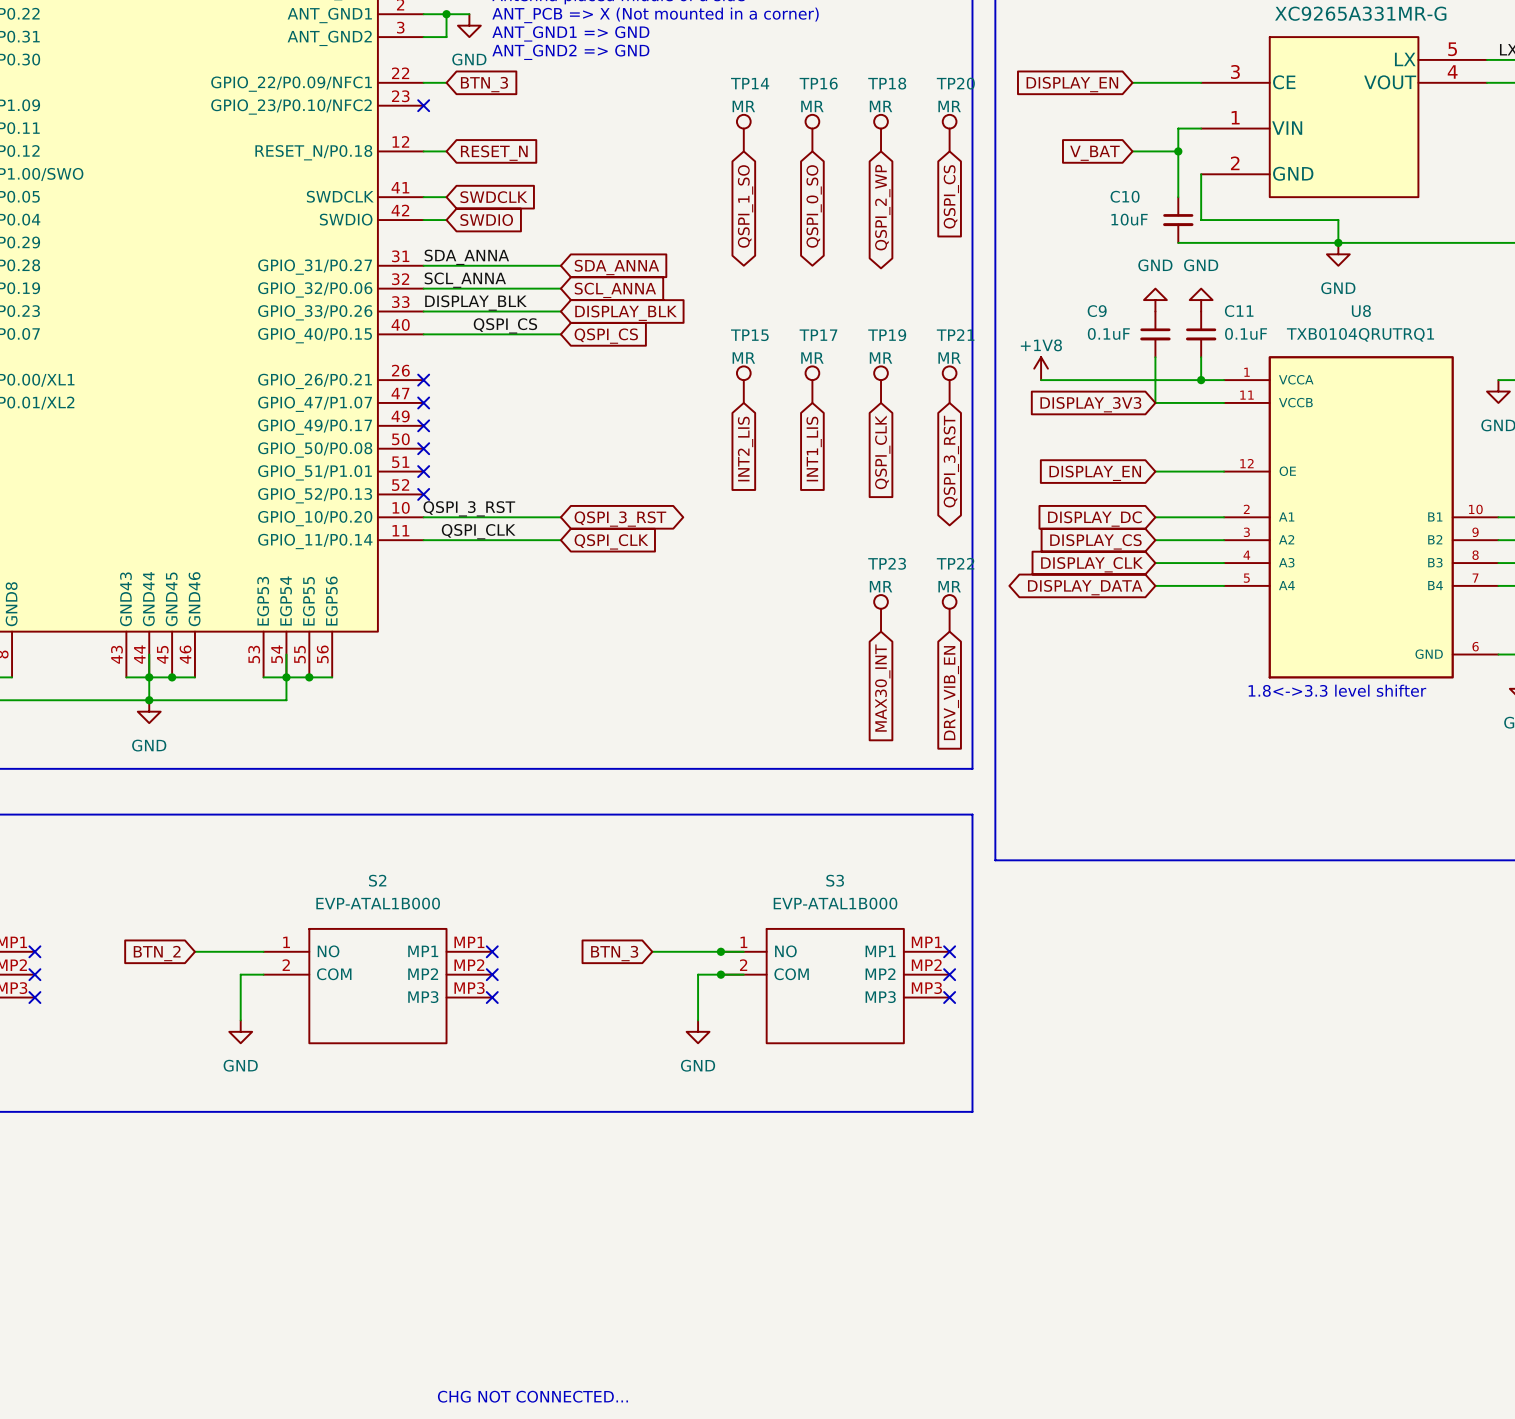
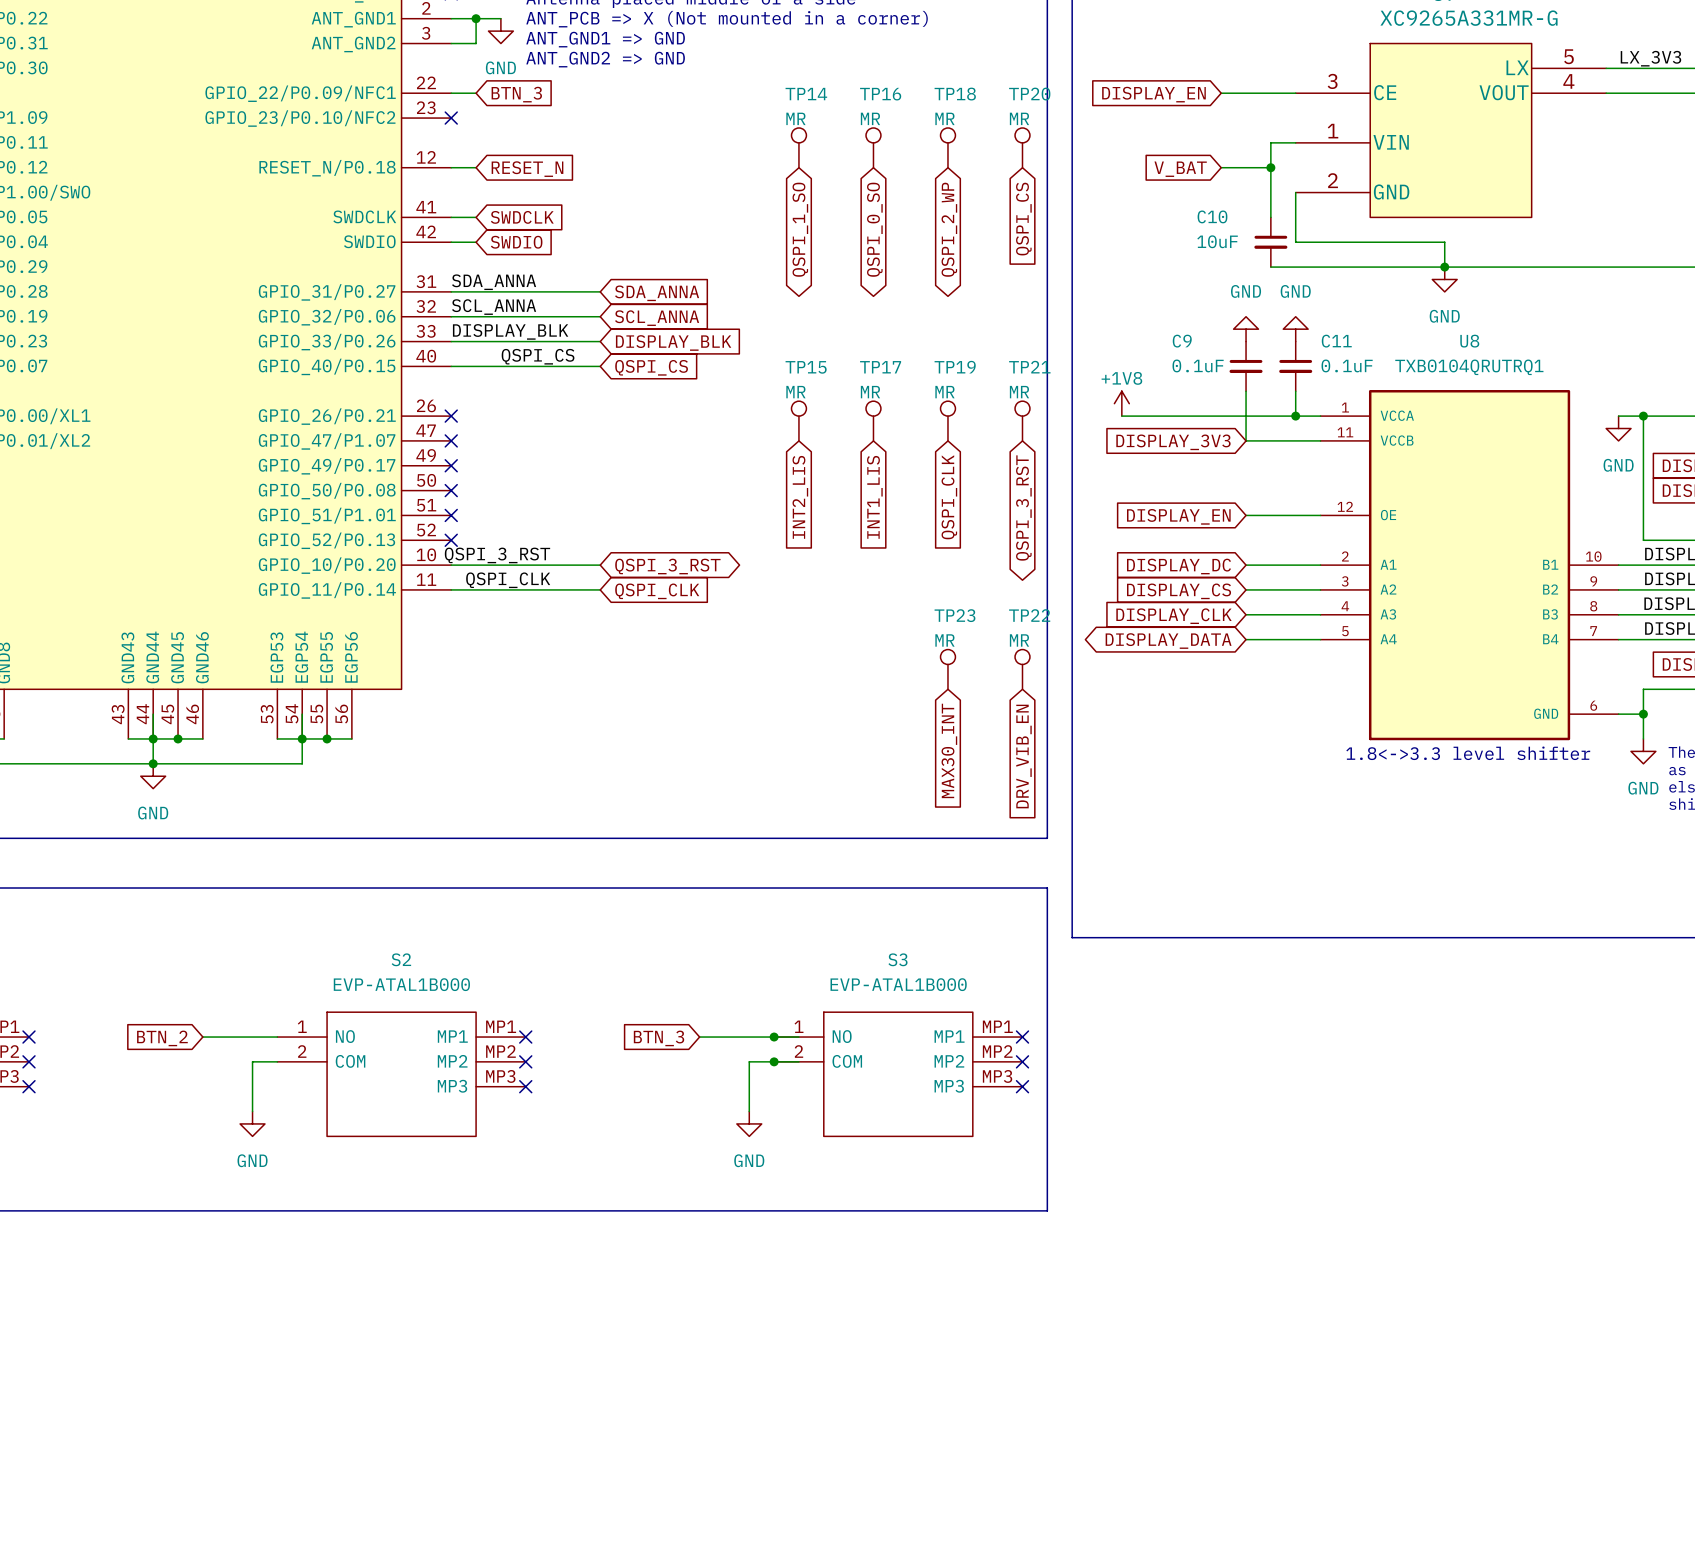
text: CHG NOT CONNECTED... (532, 1396) -> none

